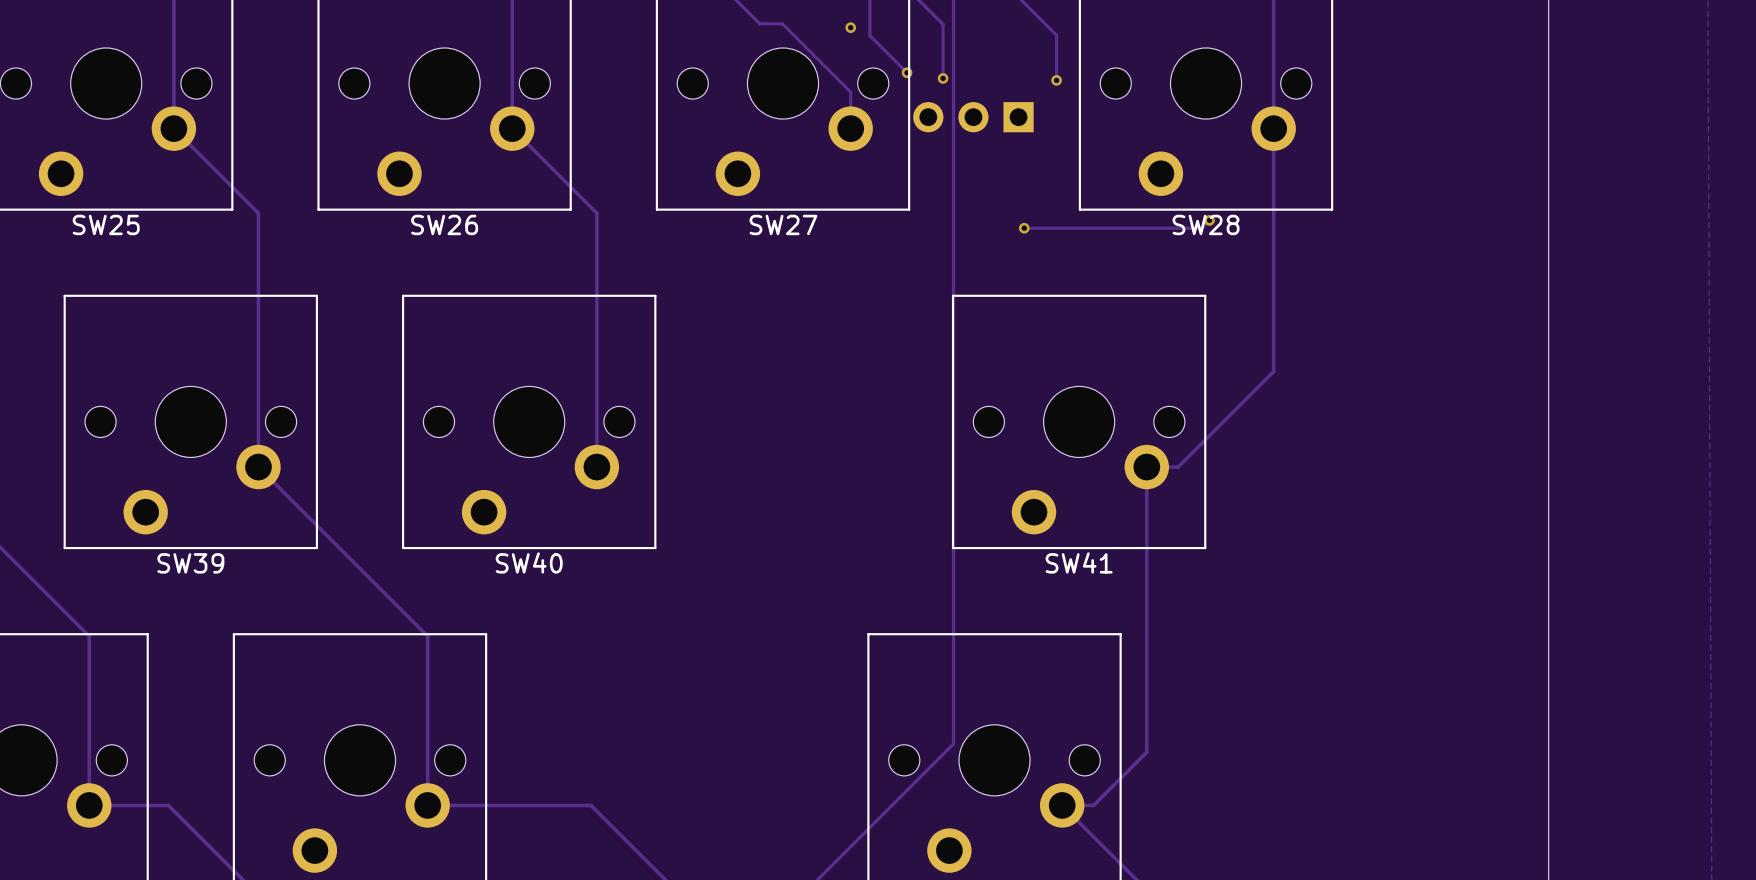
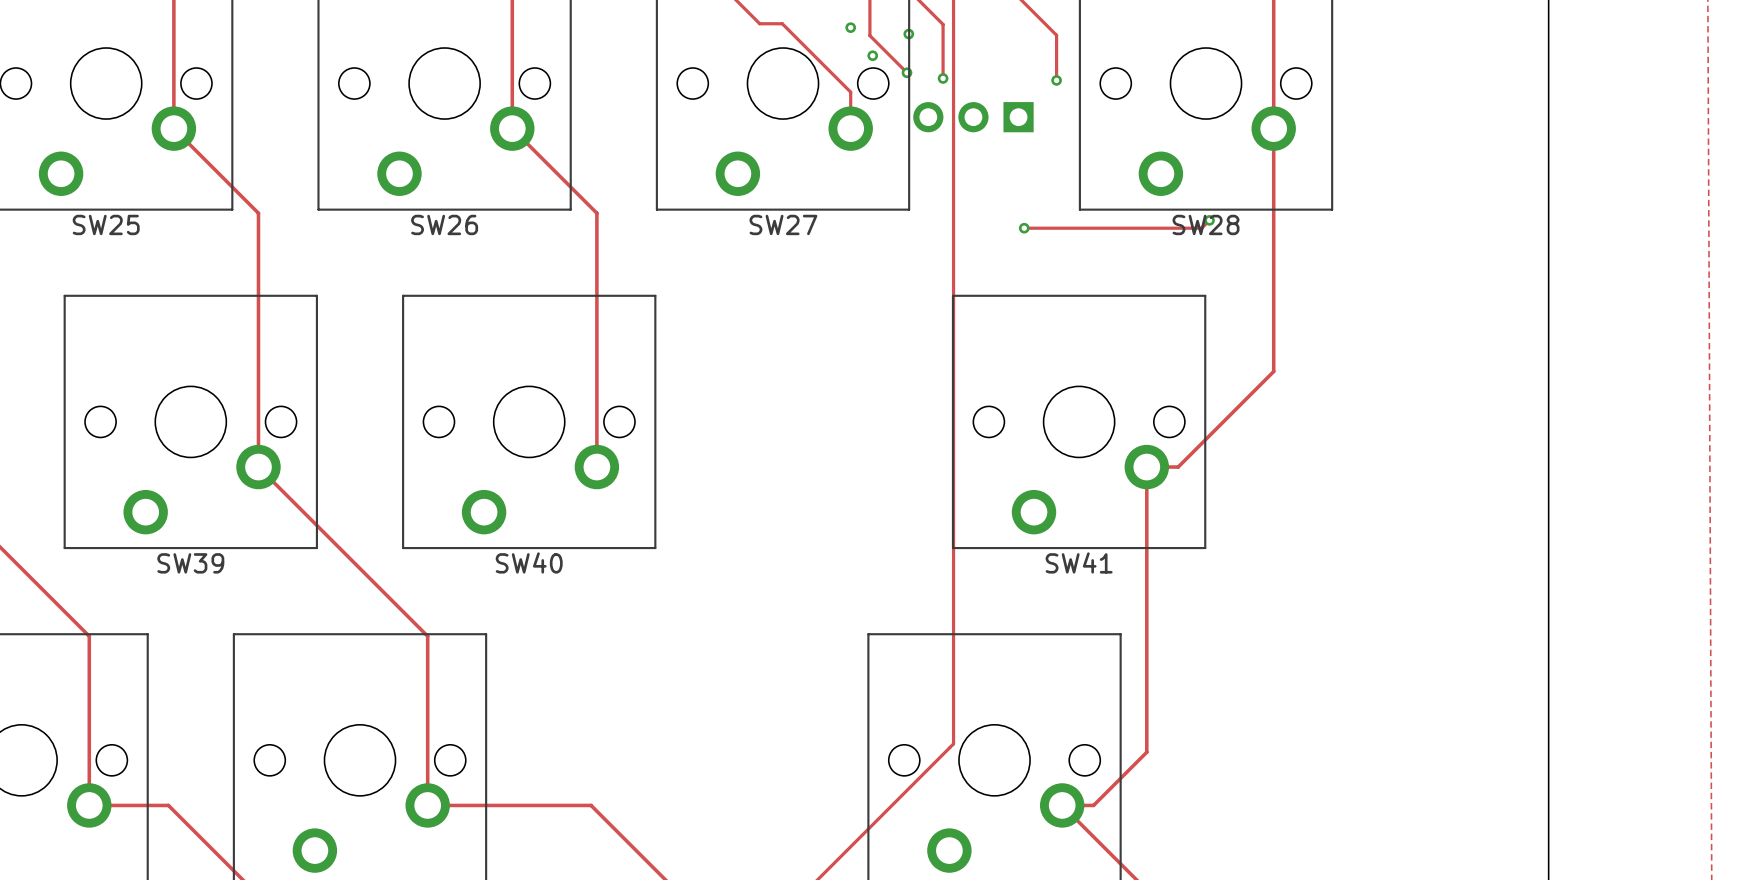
via: none -> (908, 34)
via: none -> (872, 55)

